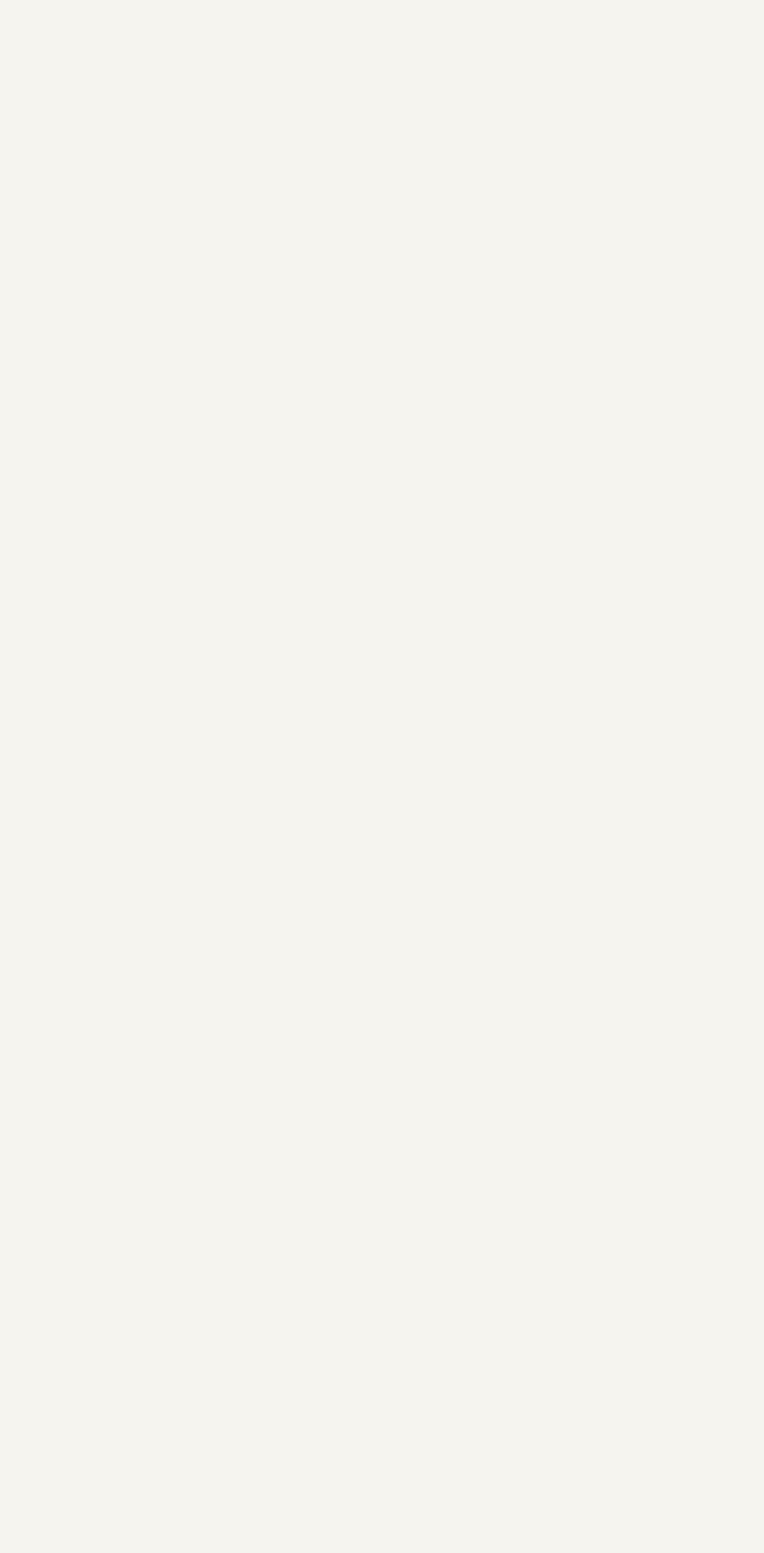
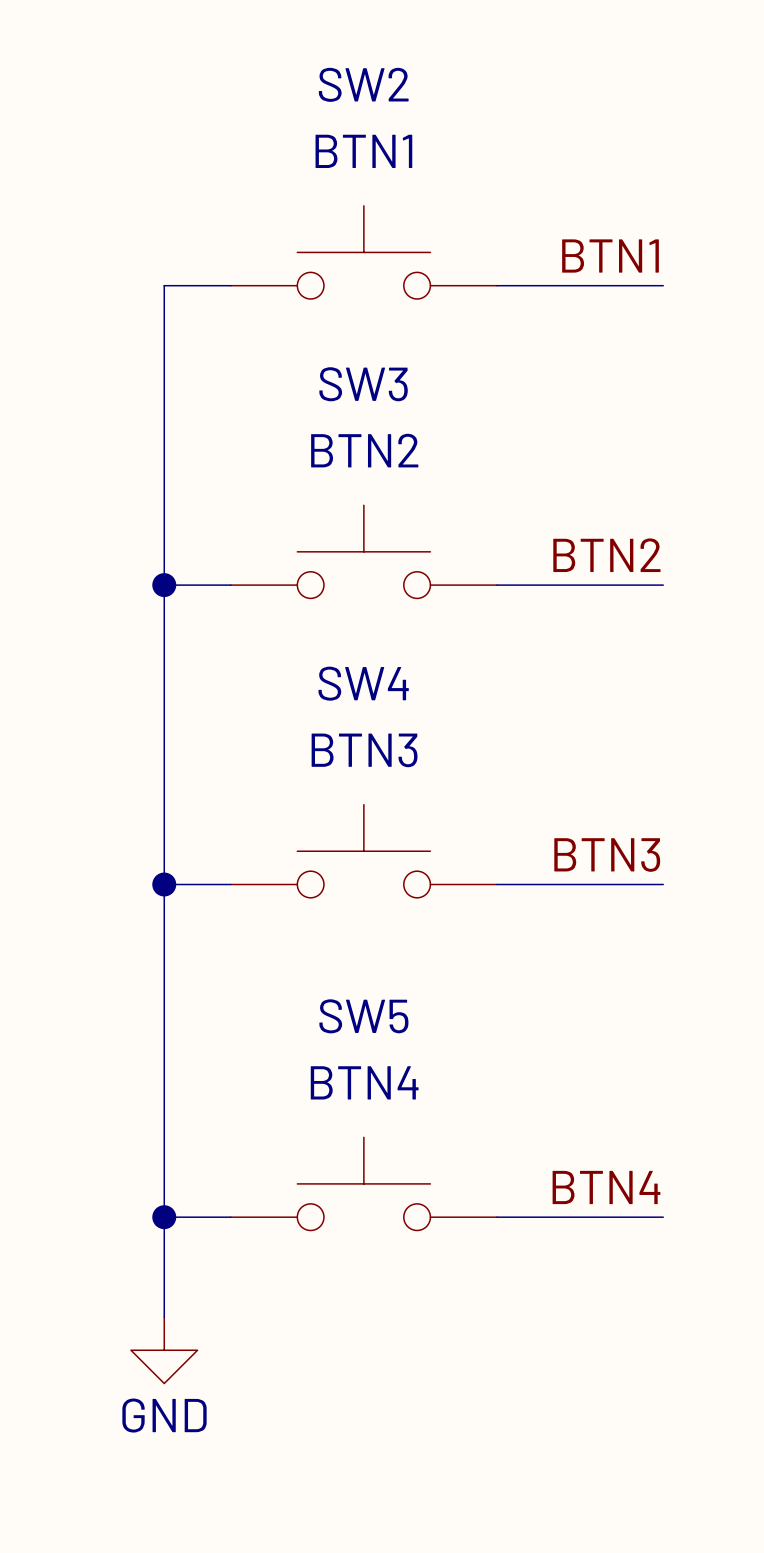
SW2: none -> BTN1 (363, 252)
label: none -> BTN1 (610, 256)
wire: none -> (230, 285) (164, 285) (164, 1316)
wire: none -> (496, 285) (663, 285)
SW3: none -> BTN2 (363, 551)
label: none -> BTN2 (606, 555)
wire: none -> (164, 585) (230, 585)
junction: none -> (164, 585)
wire: none -> (496, 585) (663, 585)
SW4: none -> BTN3 (363, 851)
label: none -> BTN3 (607, 855)
wire: none -> (164, 884) (230, 884)
junction: none -> (164, 884)
wire: none -> (496, 884) (663, 884)
SW5: none -> BTN4 (363, 1183)
label: none -> BTN4 (606, 1187)
wire: none -> (164, 1217) (230, 1217)
junction: none -> (164, 1217)
wire: none -> (496, 1217) (663, 1217)
power symbol: none -> GND (164, 1350)

